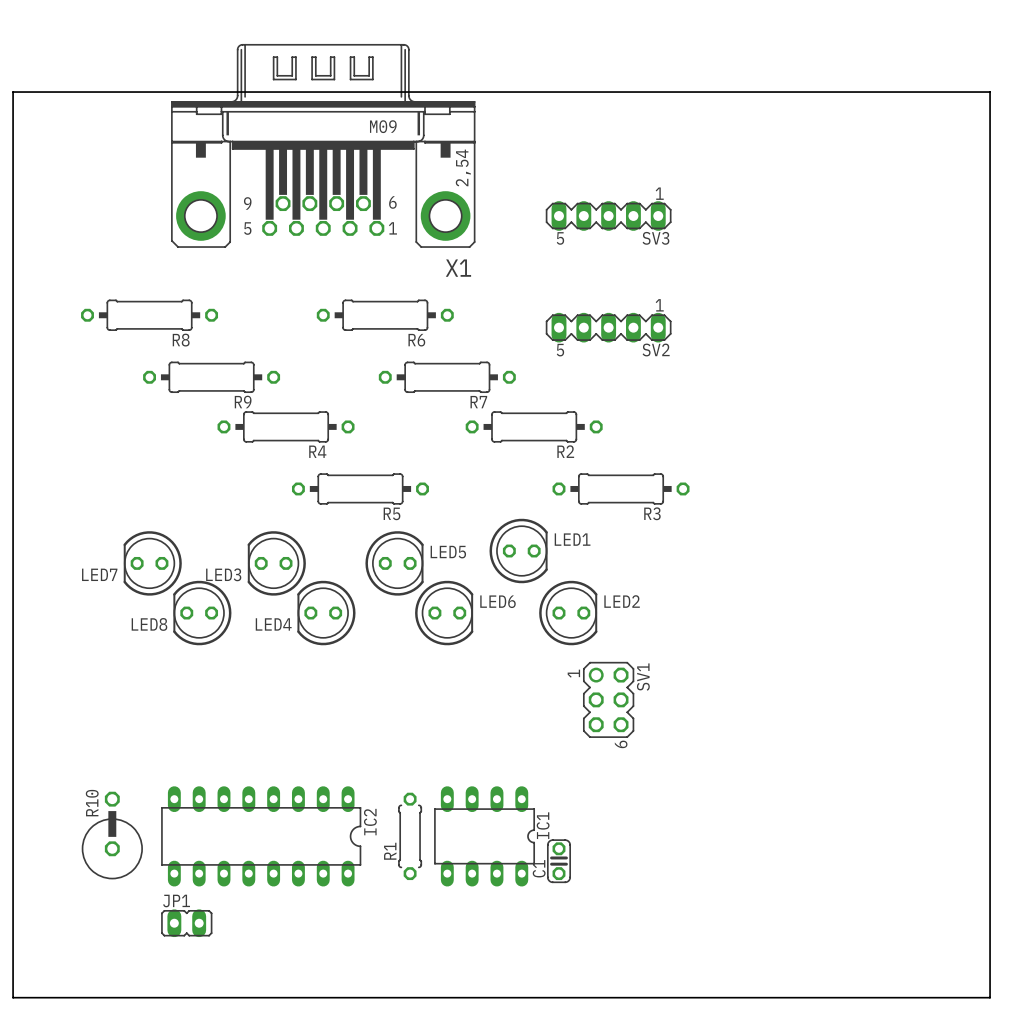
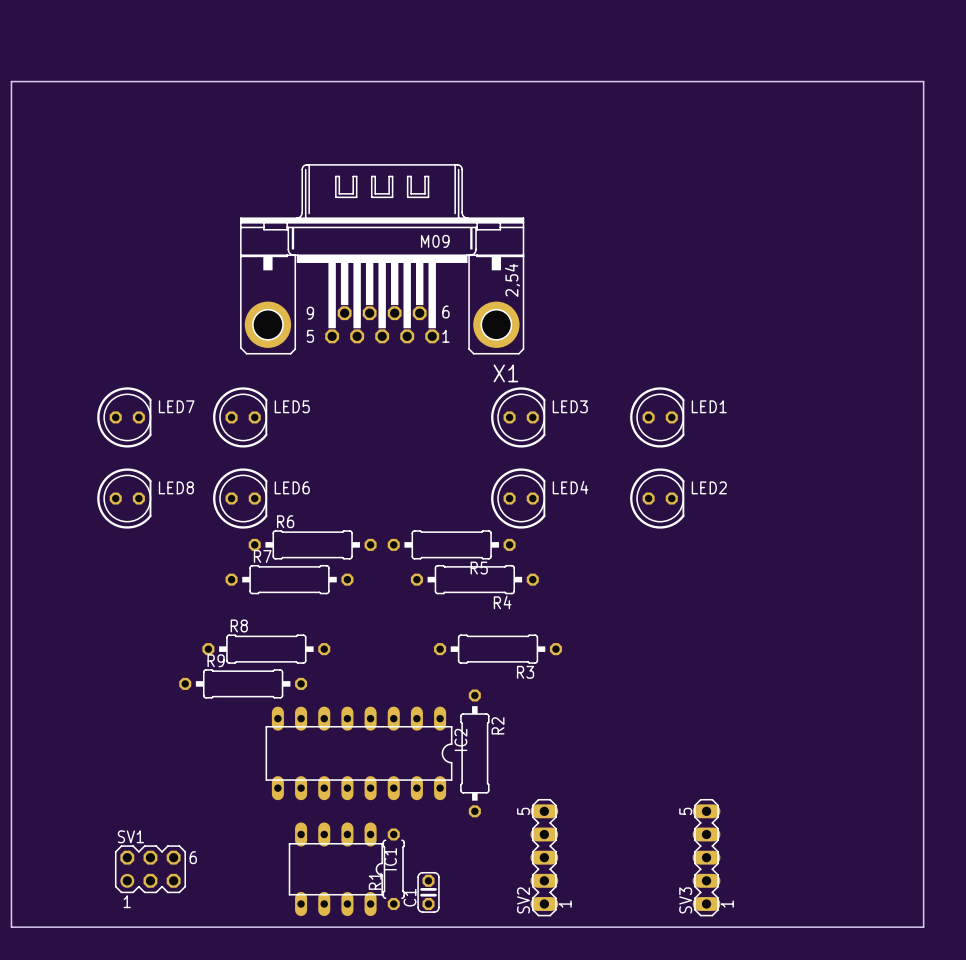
X1 position: (323, 145) -> (382, 259)
SV3 footprint: [545, 201, 672, 231] -> [692, 799, 721, 917]
SV3 name position: SV3 (655, 238) -> SV3 (685, 900)
SV2 footprint: [545, 312, 672, 343] -> [530, 799, 559, 917]
R8 position: (149, 315) -> (266, 649)
R6 position: (385, 315) -> (312, 544)
R8 name position: R8 (181, 340) -> R8 (239, 625)
R6 name position: R6 (416, 340) -> R6 (285, 521)
SV2 name position: SV2 (656, 350) -> SV2 (523, 900)
R9 position: (211, 377) -> (243, 683)
R7 position: (447, 377) -> (289, 579)
R9 name position: R9 (243, 402) -> R9 (216, 660)
R7 name position: R7 (478, 402) -> R7 (262, 556)
R4 position: (286, 426) -> (474, 579)
R2 rotation: 0° (534, 426) -> 90° clockwise (474, 753)
R2 position: (534, 426) -> (474, 753)
R2 name position: R2 (565, 451) -> R2 (498, 725)
R5 position: (360, 488) -> (451, 544)
R3 position: (621, 488) -> (498, 649)
LED1 position: (518, 551) -> (657, 417)
LED7 rotation: 0° (152, 563) -> 180° (124, 417)
LED7 position: (152, 563) -> (124, 417)
LED3 rotation: 0° (276, 563) -> 180° (518, 417)
LED3 position: (276, 563) -> (518, 417)
LED5 position: (394, 563) -> (240, 417)
LED8 rotation: 0° (202, 613) -> 180° (124, 498)
LED8 position: (202, 613) -> (124, 498)
LED4 rotation: 0° (326, 613) -> 180° (518, 498)
LED4 position: (326, 613) -> (518, 498)
LED6 position: (444, 613) -> (240, 498)
LED2 position: (568, 613) -> (657, 498)
SV1 footprint: [583, 661, 635, 738] -> [115, 845, 186, 894]
SV1 name position: SV1 (643, 677) -> SV1 (130, 836)
R10: (112, 835) -> none
IC2 position: (261, 836) -> (359, 753)
R1 position: (410, 836) -> (393, 869)
IC1 position: (484, 836) -> (335, 869)
C1 position: (558, 861) -> (428, 892)
JP1: (186, 923) -> none

